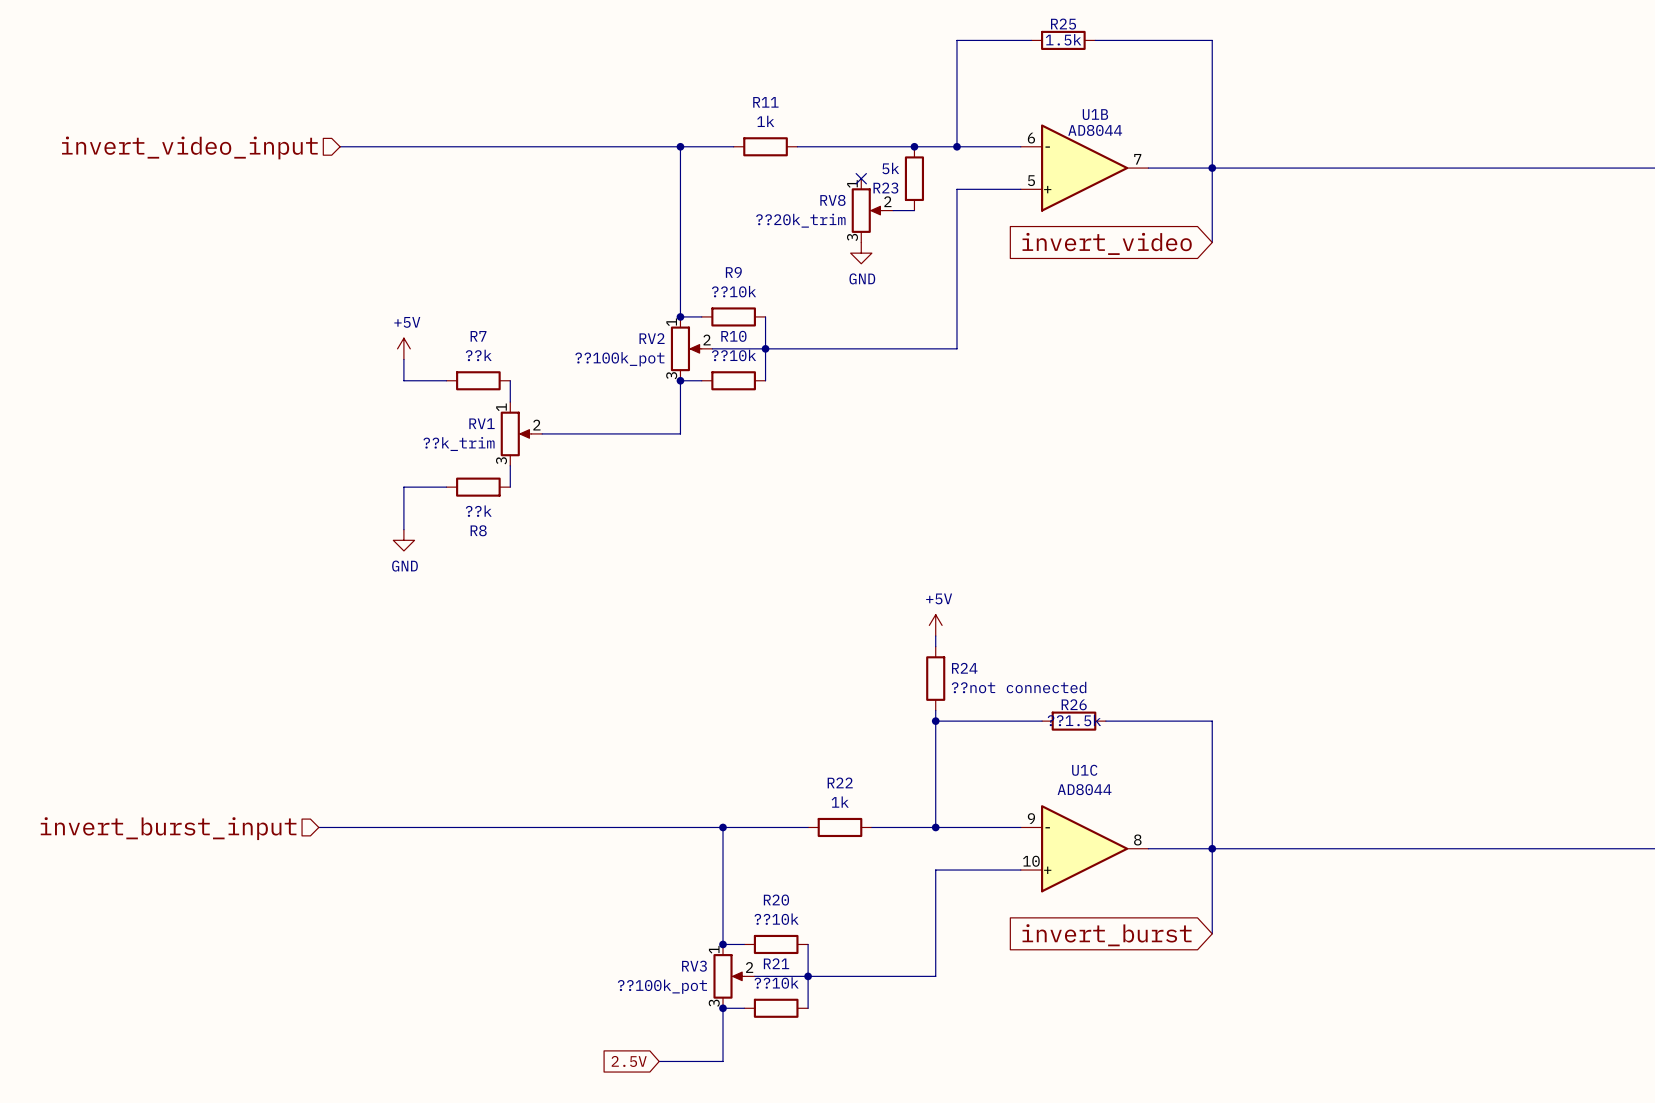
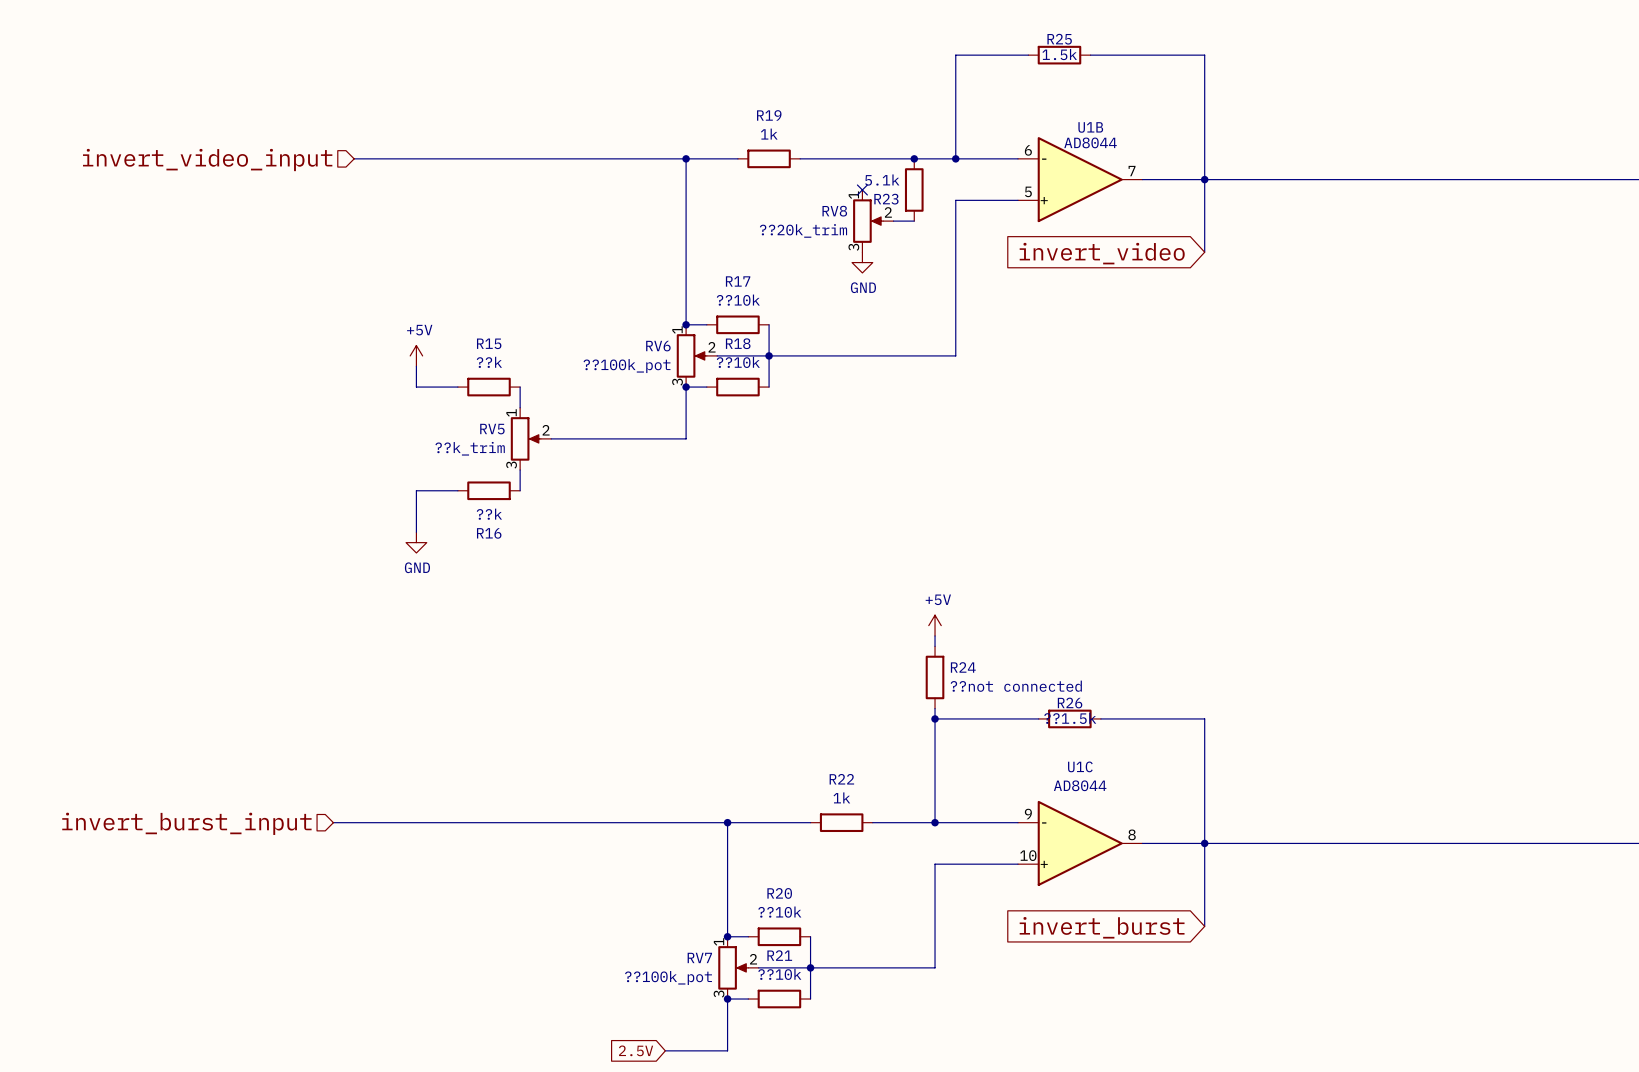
R11 name: R11 (765, 102) -> R19 (769, 115)
R23 value: 5k (890, 168) -> 5.1k (882, 180)
R9 name: R9 (733, 272) -> R17 (738, 281)
R7 name: R7 (478, 336) -> R15 (489, 343)
R10 name: R10 (733, 336) -> R18 (738, 343)
RV2 name: RV2 (652, 338) -> RV6 (658, 346)
RV1 name: RV1 (482, 423) -> RV5 (492, 429)
R8 name: R8 (478, 530) -> R16 (489, 533)
RV3 name: RV3 (694, 966) -> RV7 (699, 957)

